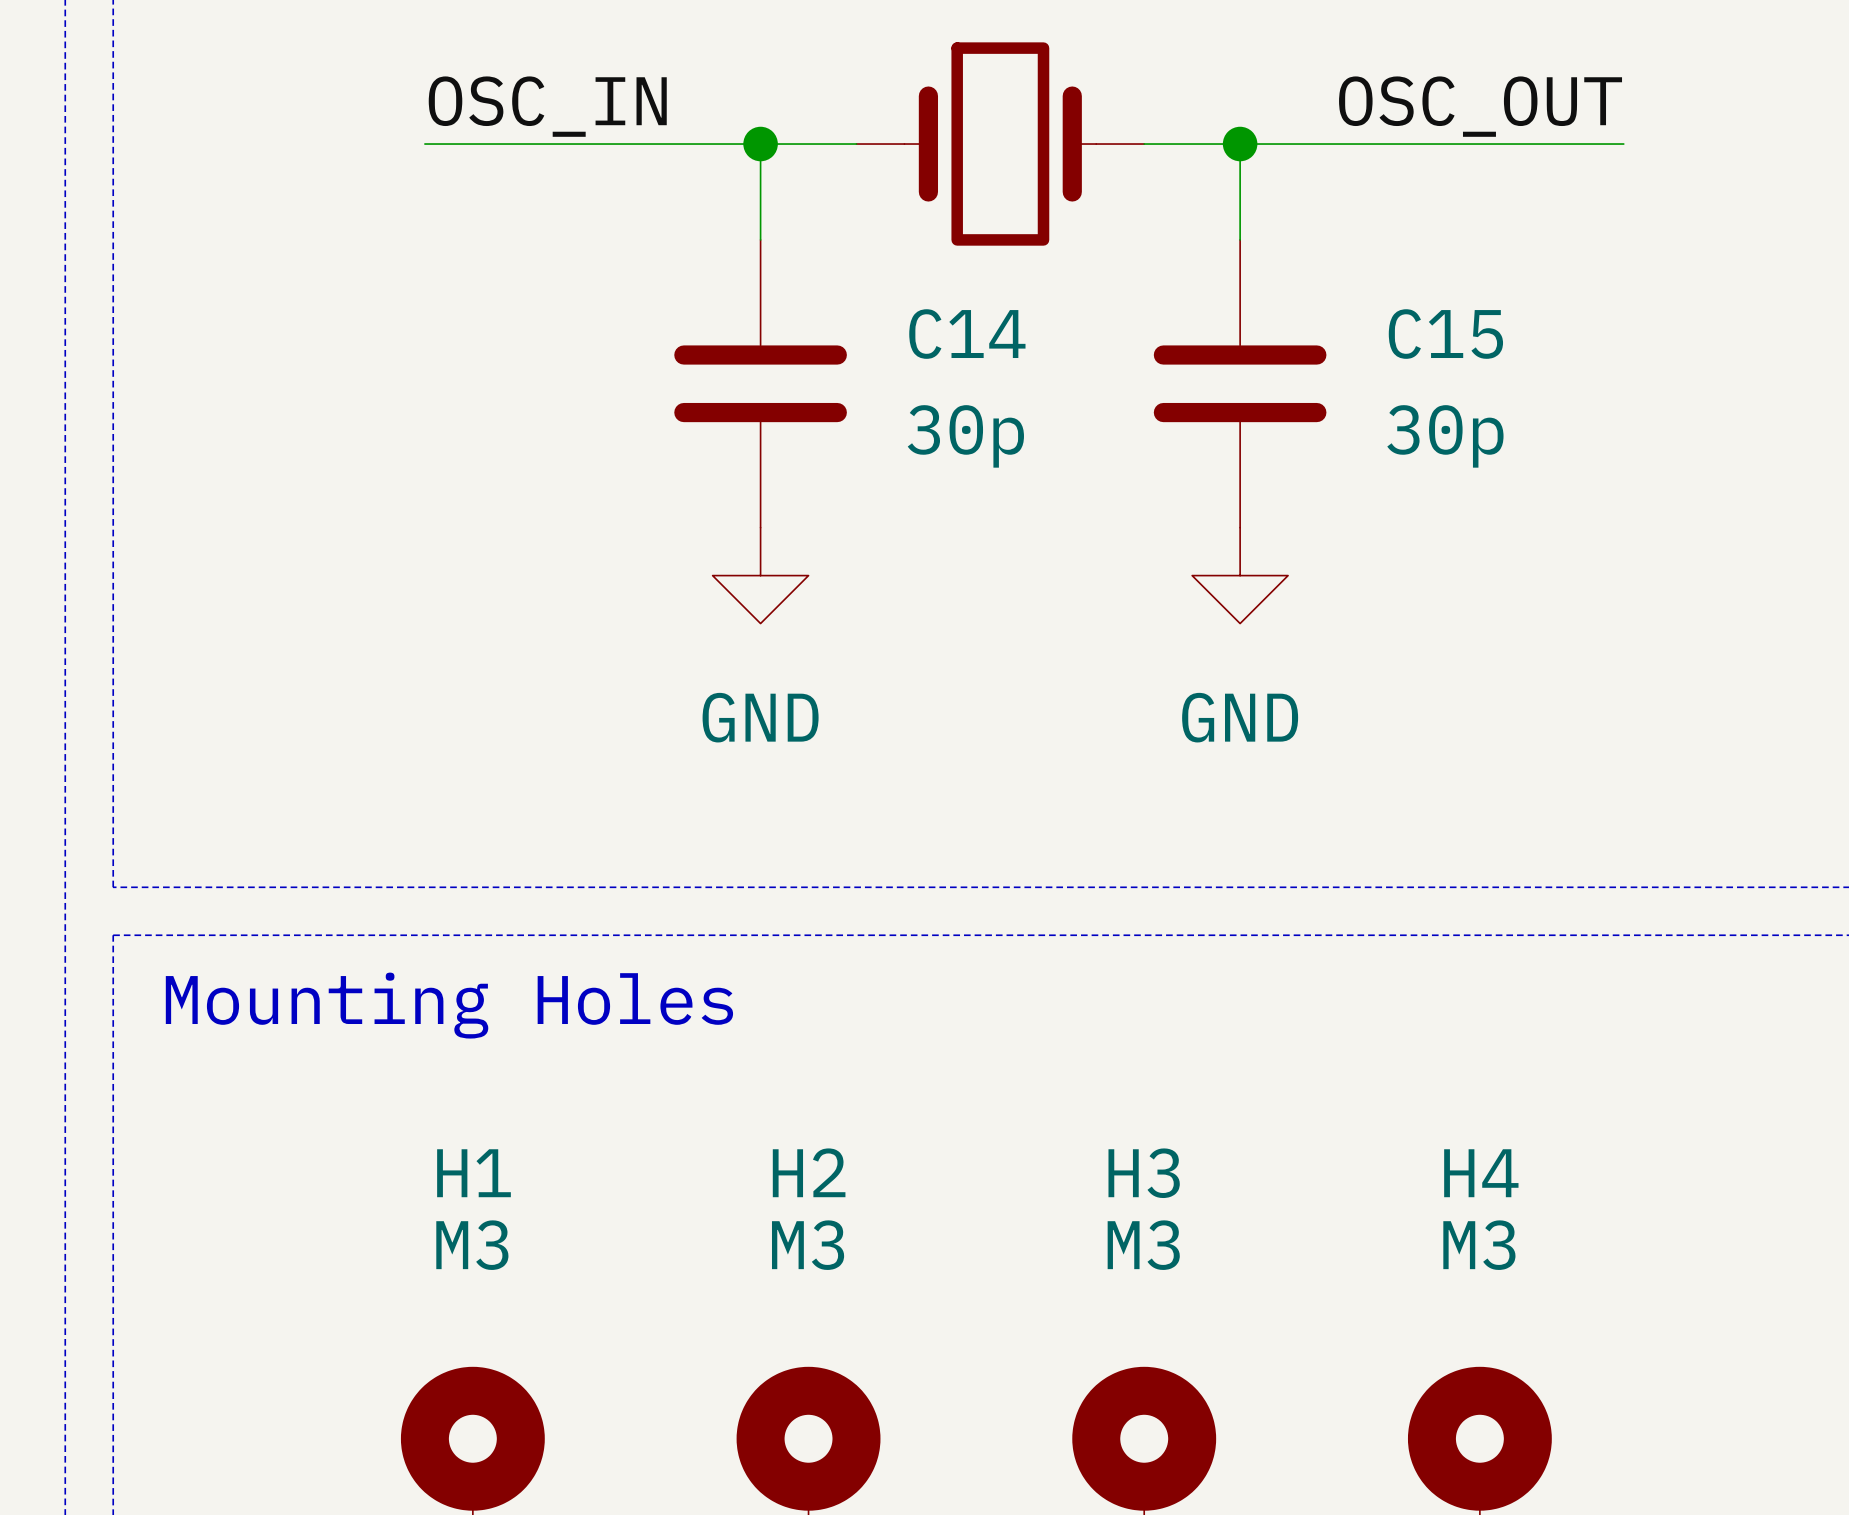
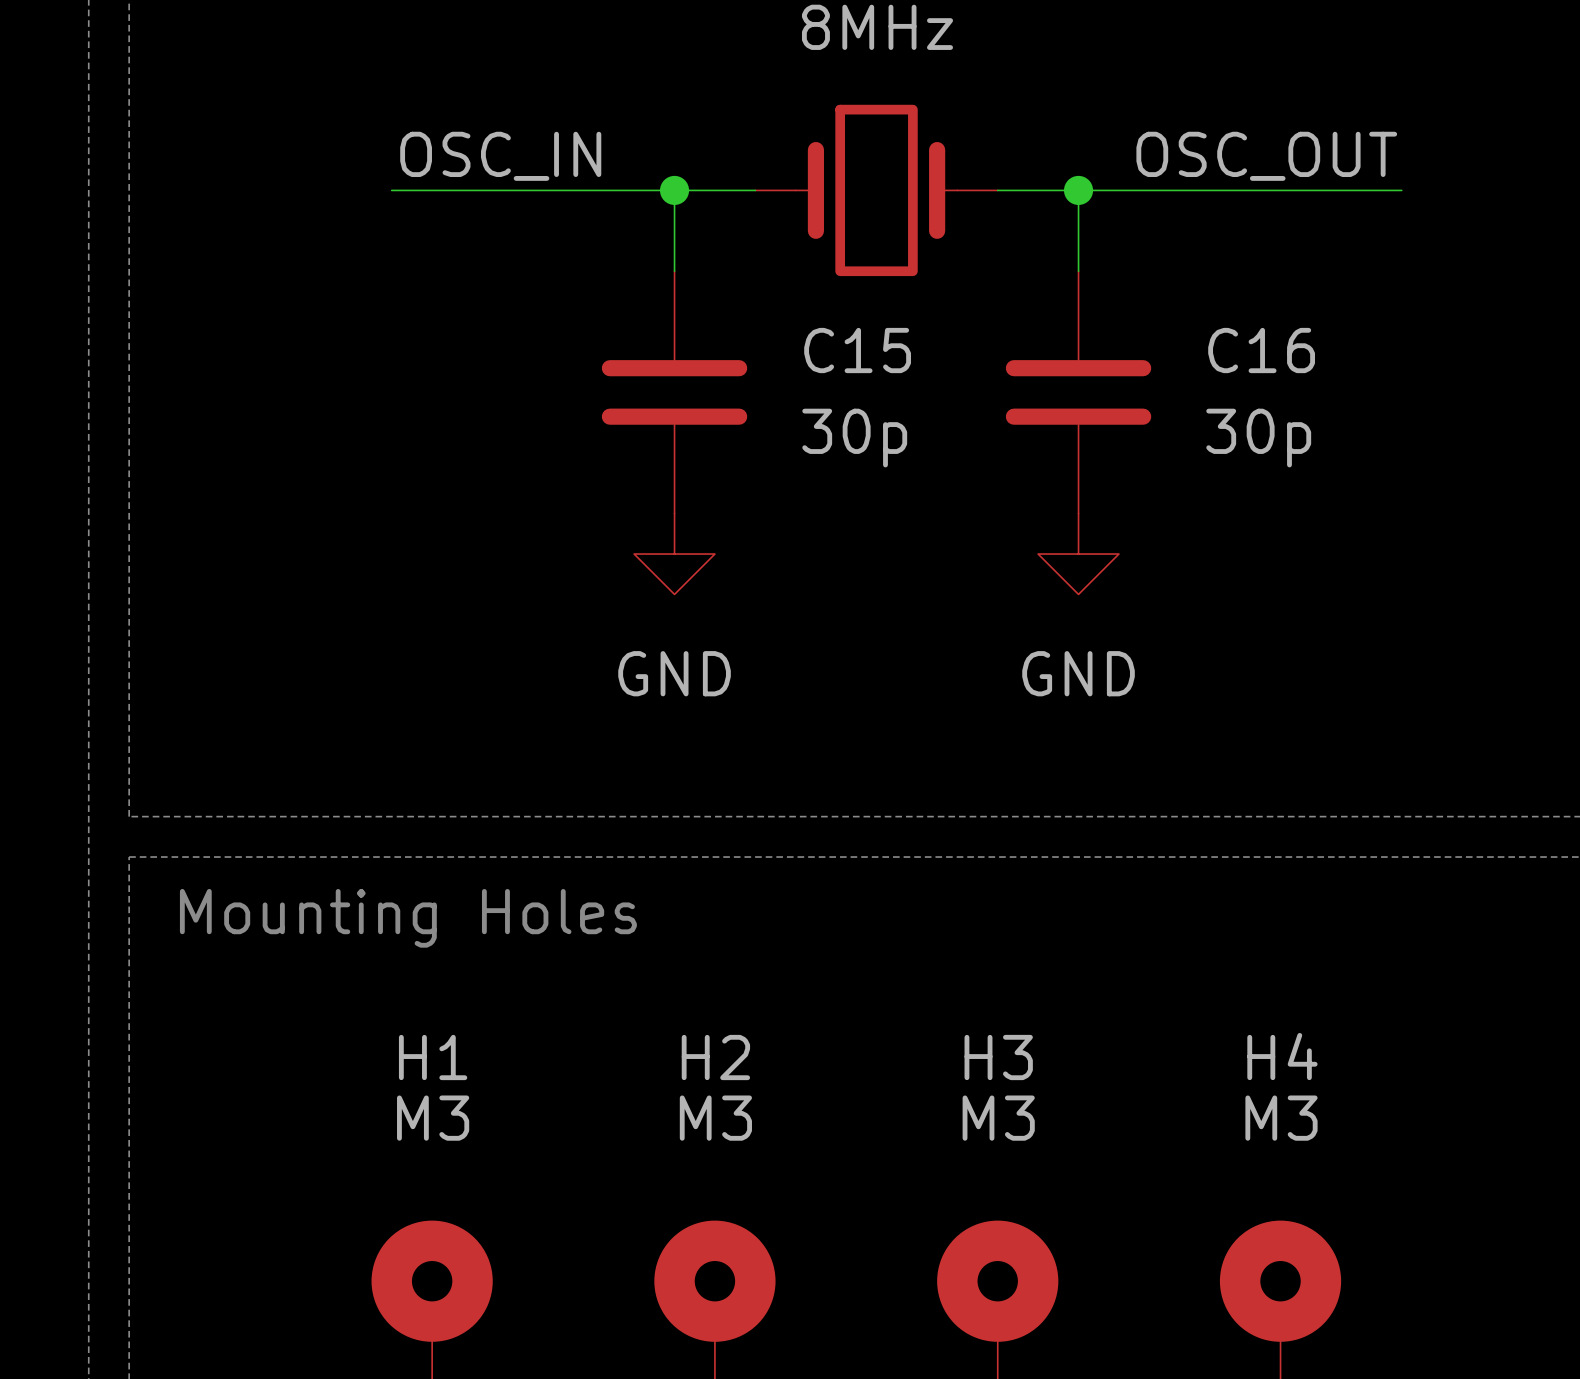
C14 name: C14 (967, 334) -> C15 (857, 350)
C15 name: C15 (1445, 334) -> C16 (1261, 350)

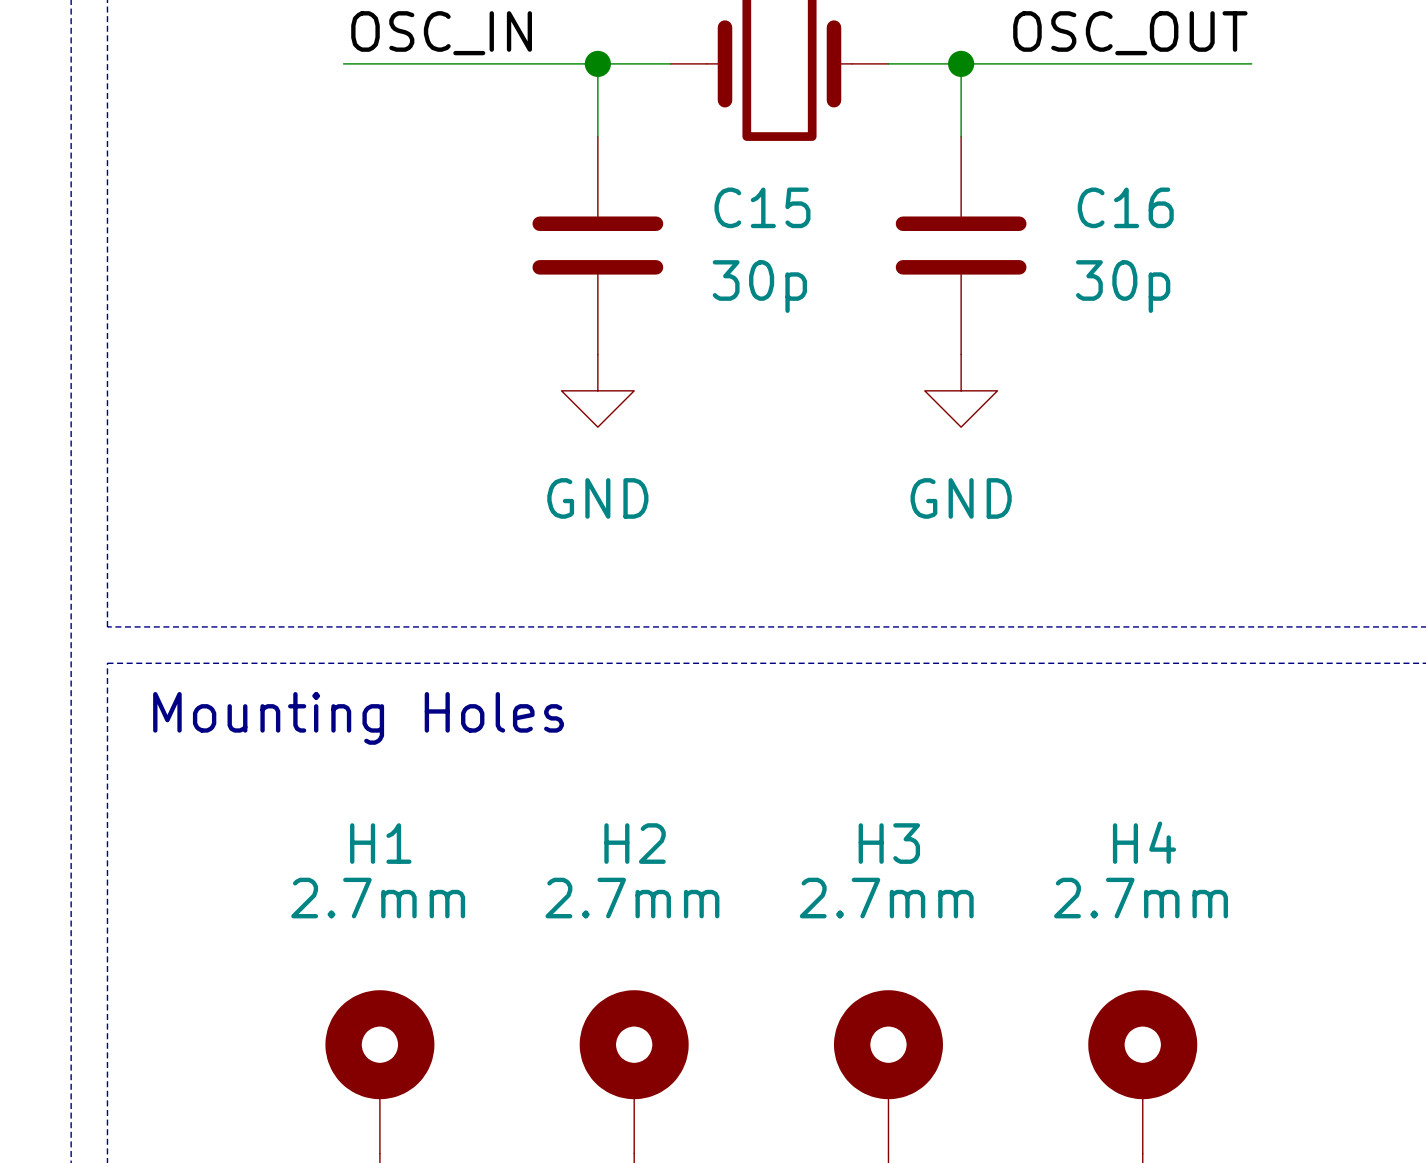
H1 value: M3 (433, 1118) -> 2.7mm (378, 898)
H2 value: M3 (715, 1118) -> 2.7mm (632, 898)
H3 value: M3 (998, 1118) -> 2.7mm (886, 898)
H4 value: M3 (1281, 1118) -> 2.7mm (1141, 898)

